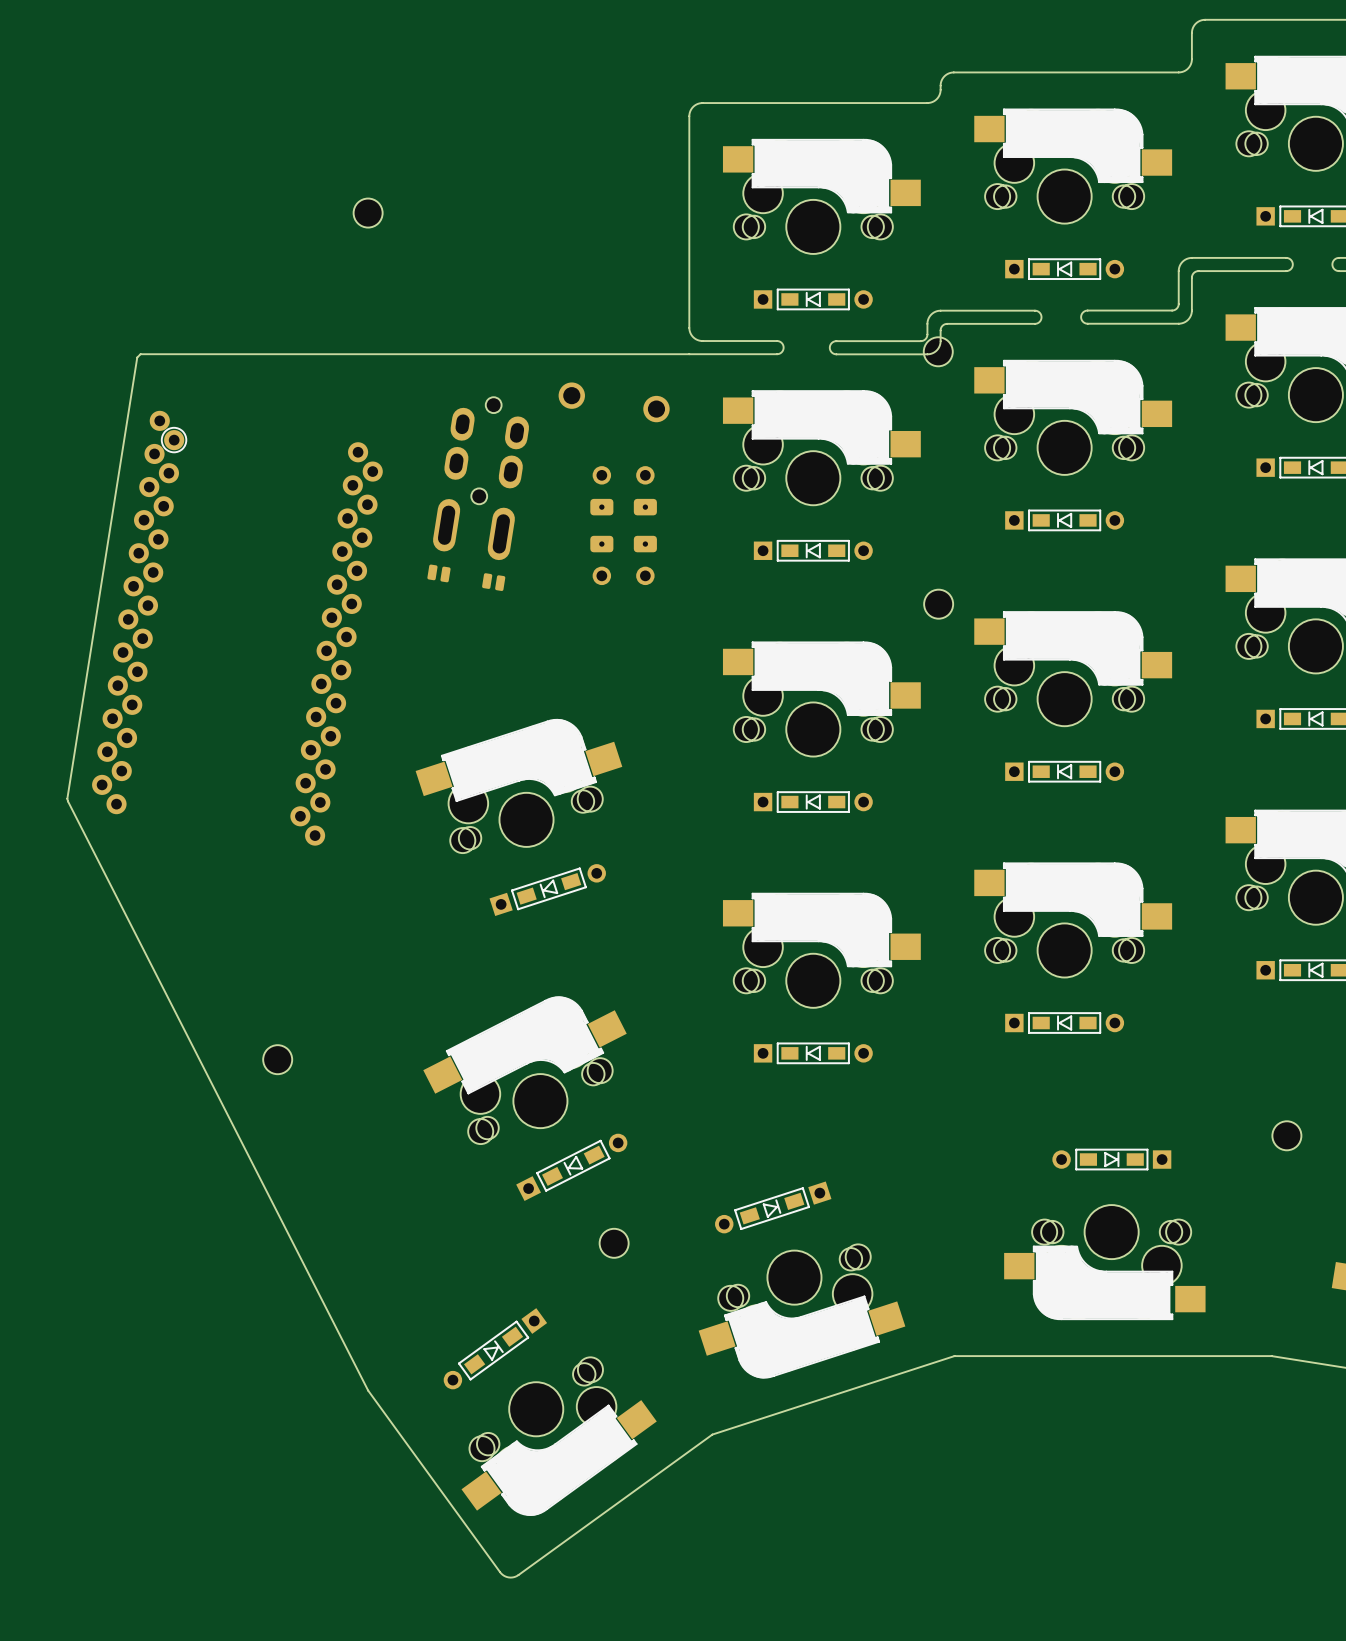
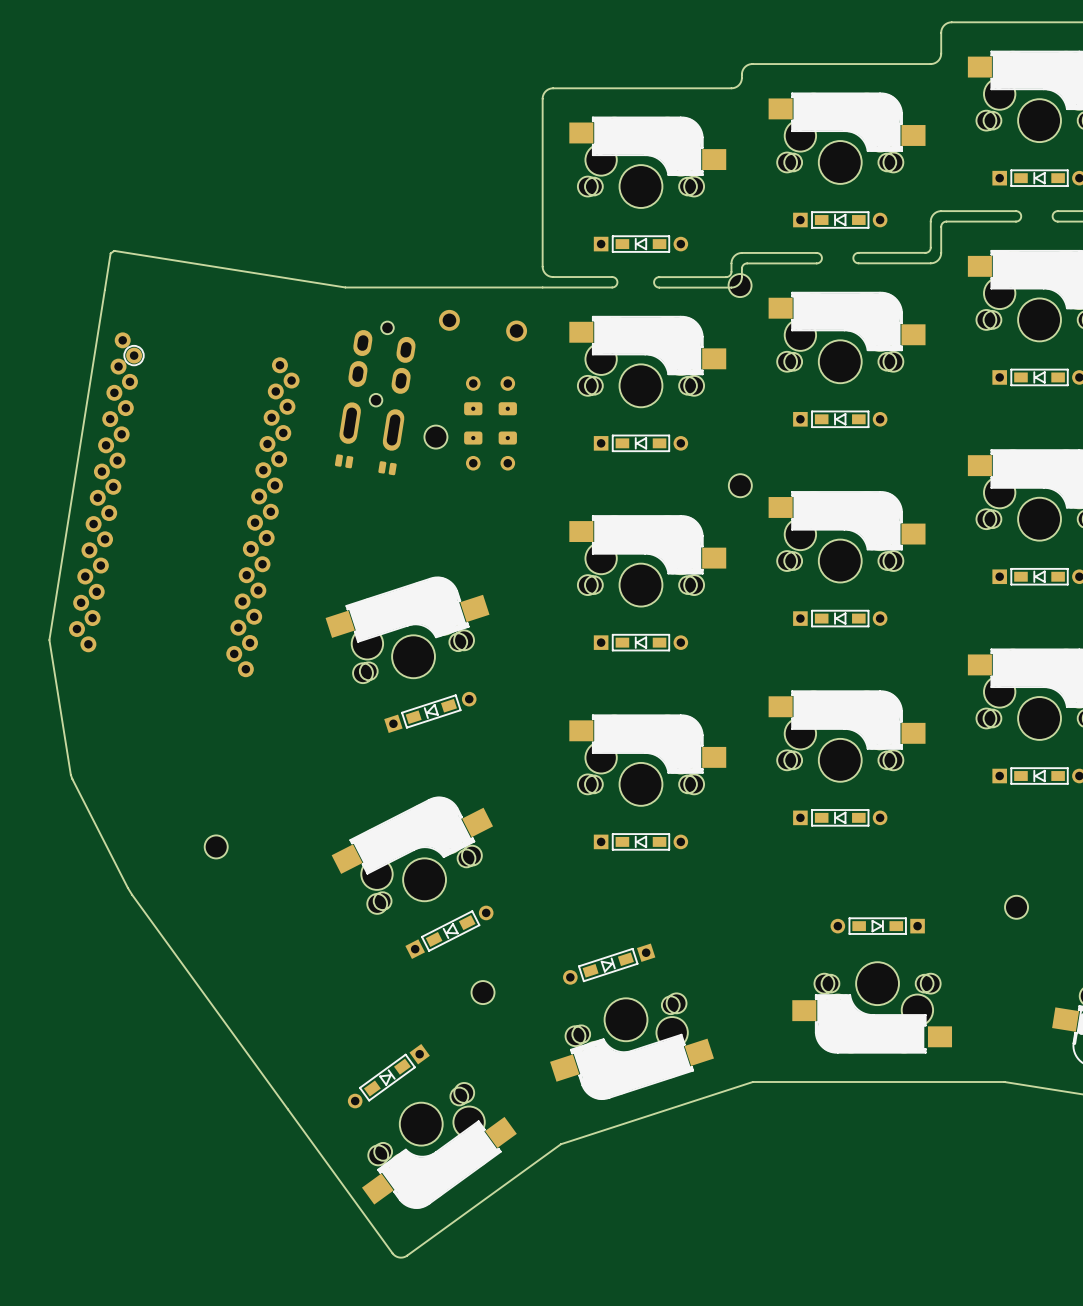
part: (368, 213) -> none
board edge: (440, 354) (140, 354) (137, 357) -> (345, 287) (114, 250) (110, 253) (104, 290)
part: none -> (435, 437)
board edge: (67, 798) (368, 1390) -> (49, 640) (72, 779) (132, 894) (288, 1109)

